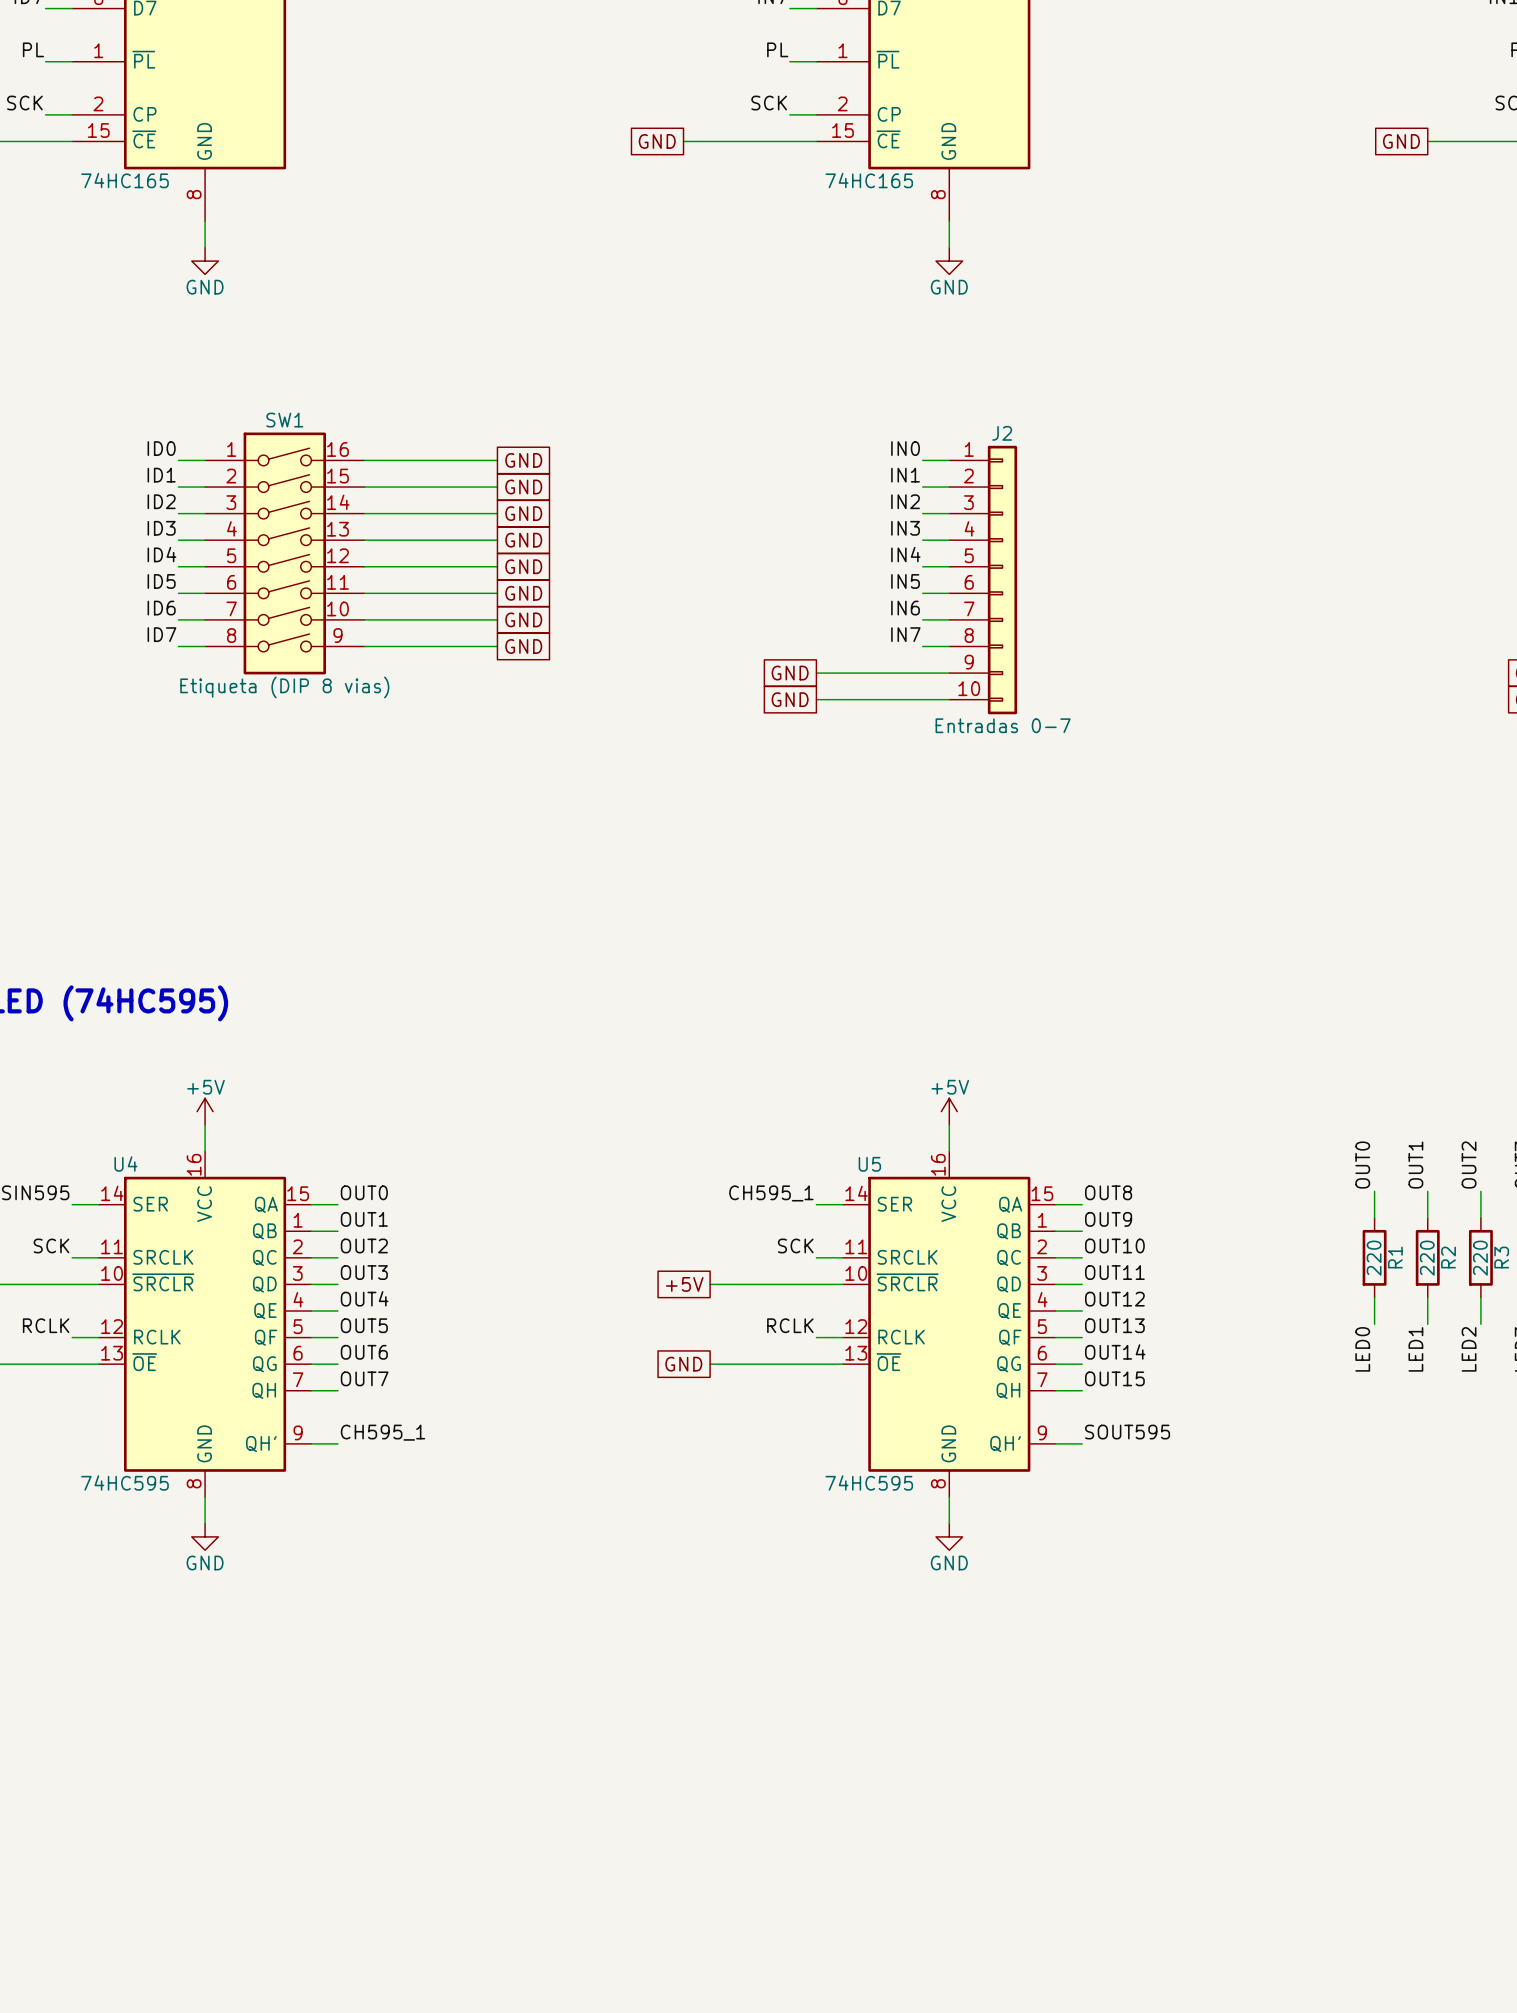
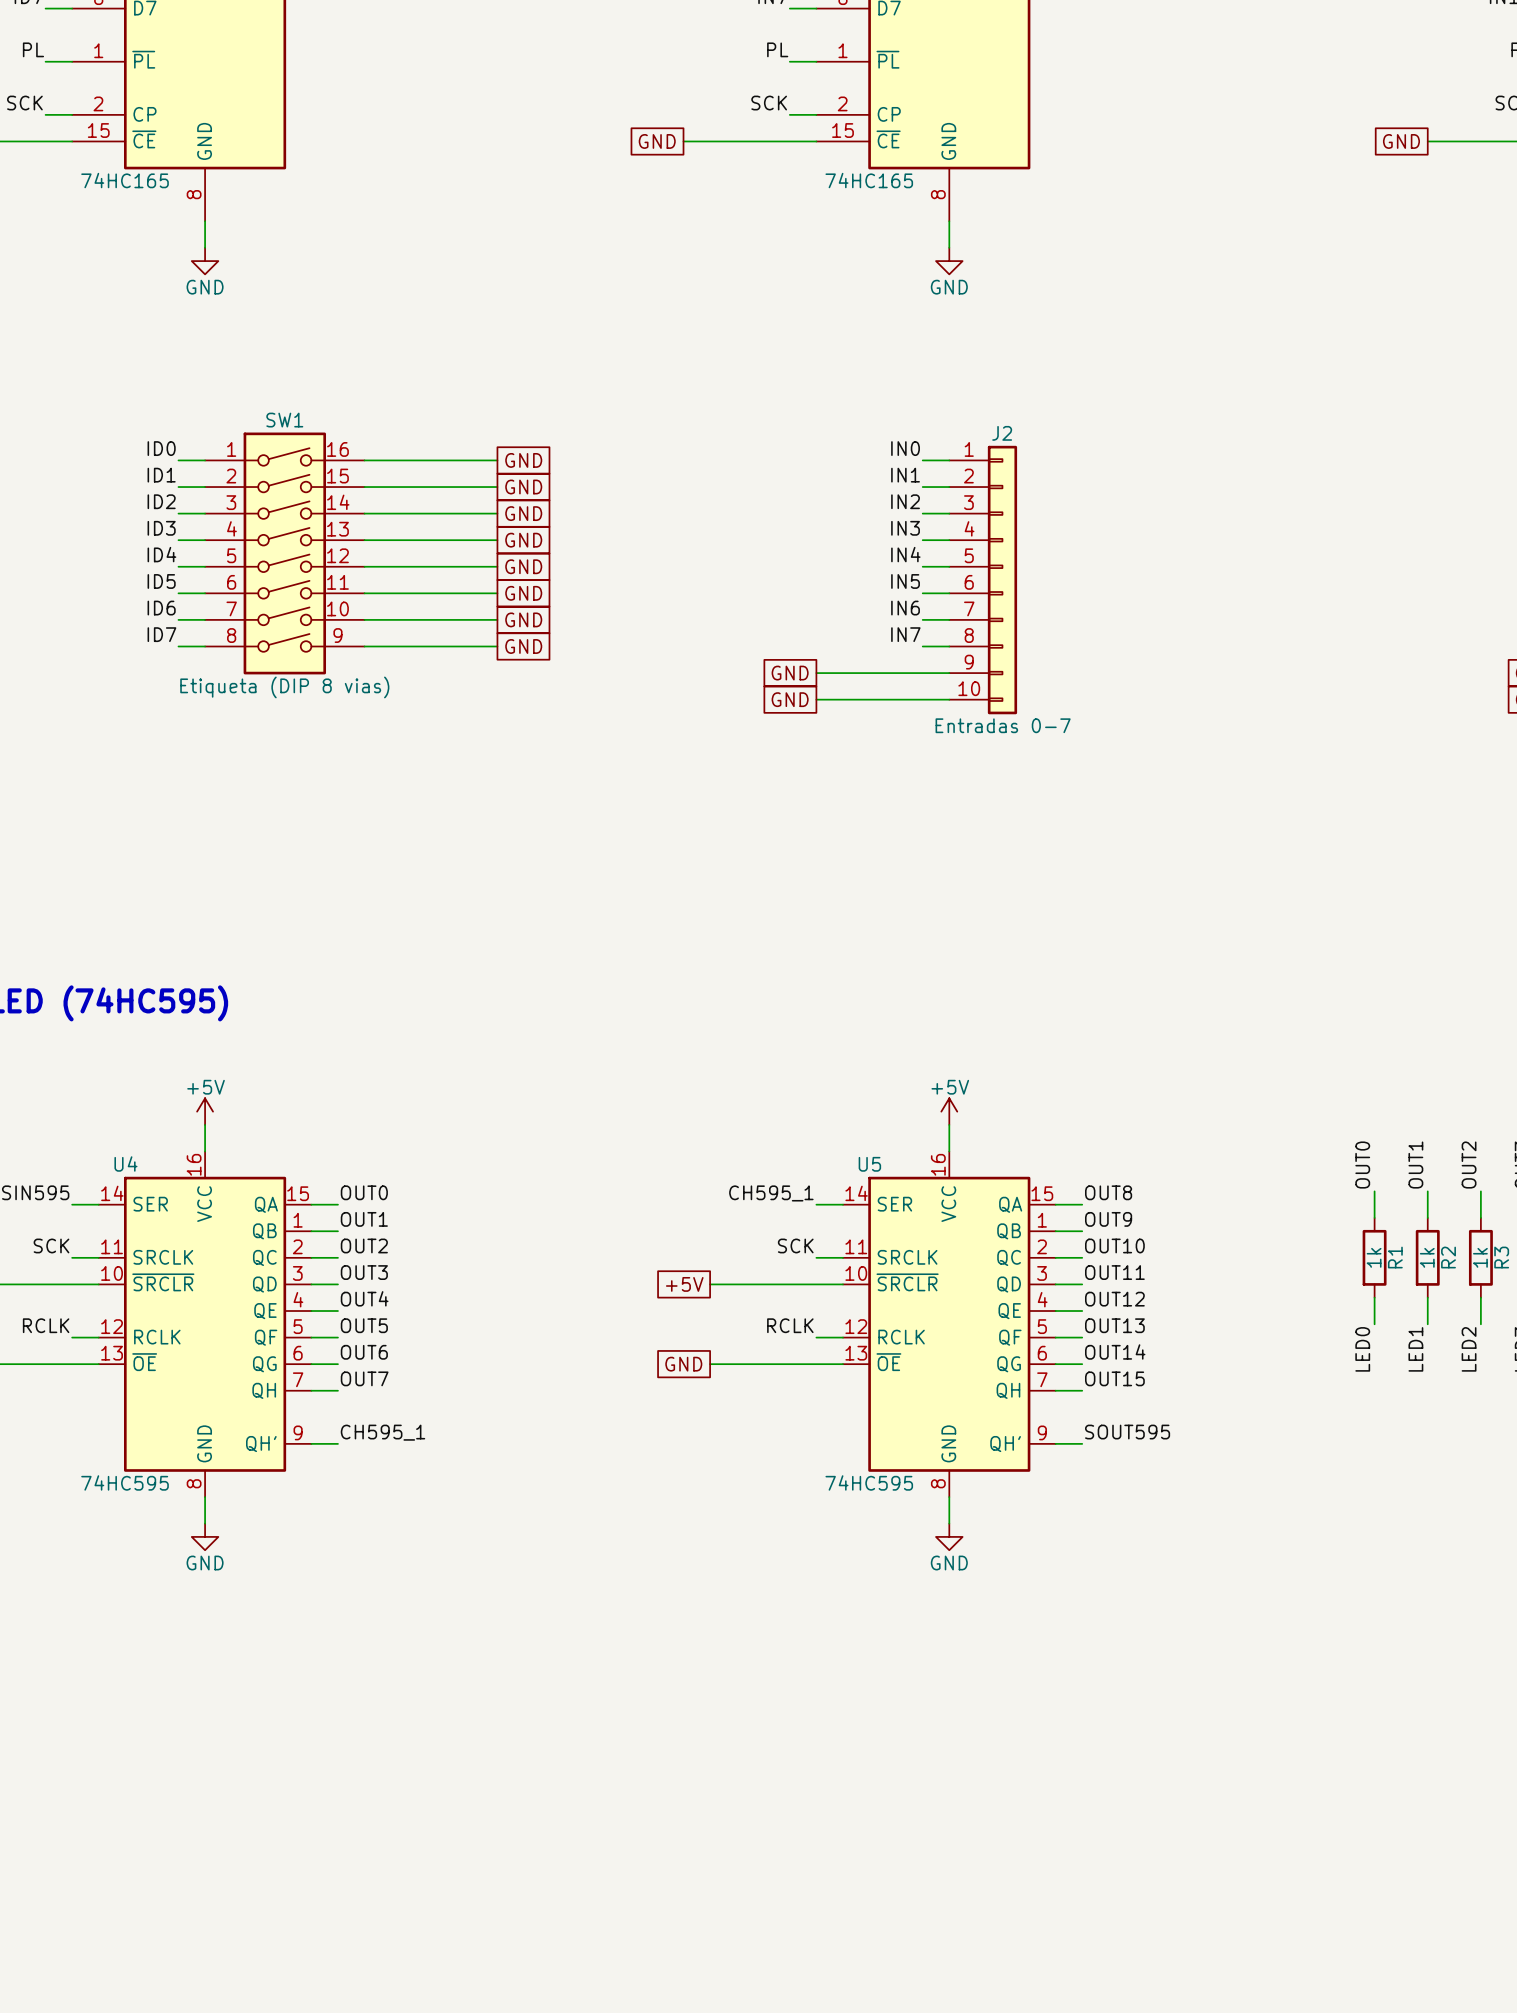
R1 value: 220 (1374, 1258) -> 1k (1374, 1257)
R2 value: 220 (1427, 1258) -> 1k (1427, 1257)
R3 value: 220 (1480, 1258) -> 1k (1480, 1257)

